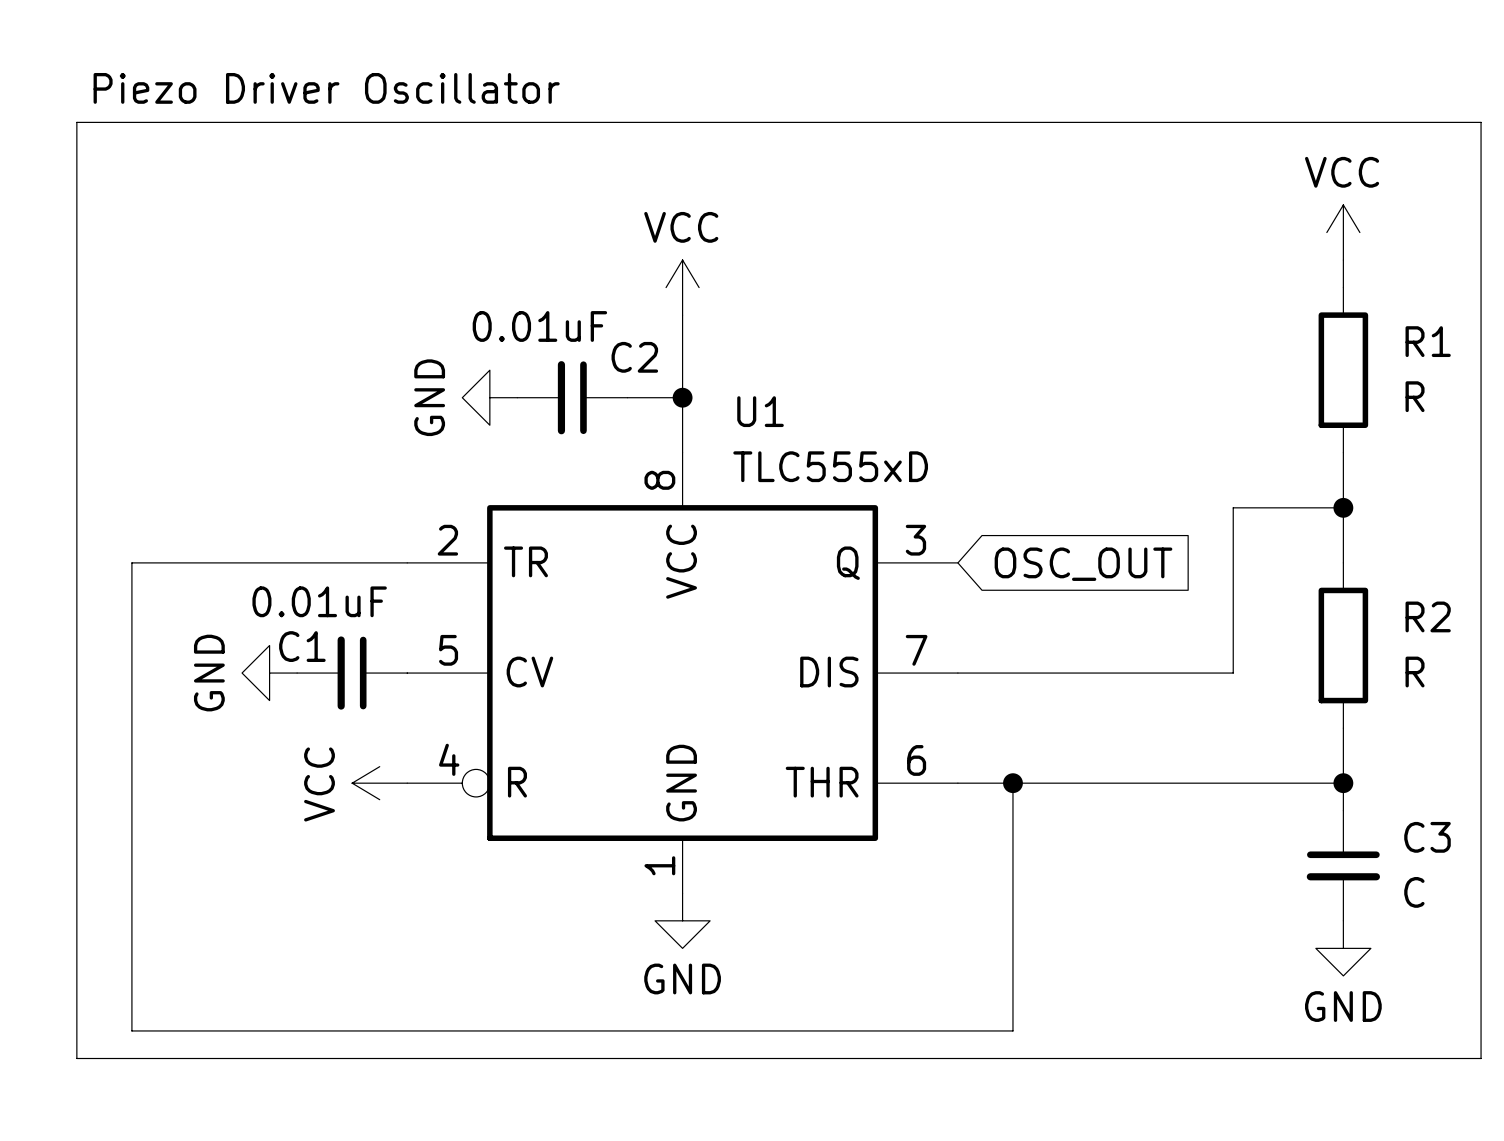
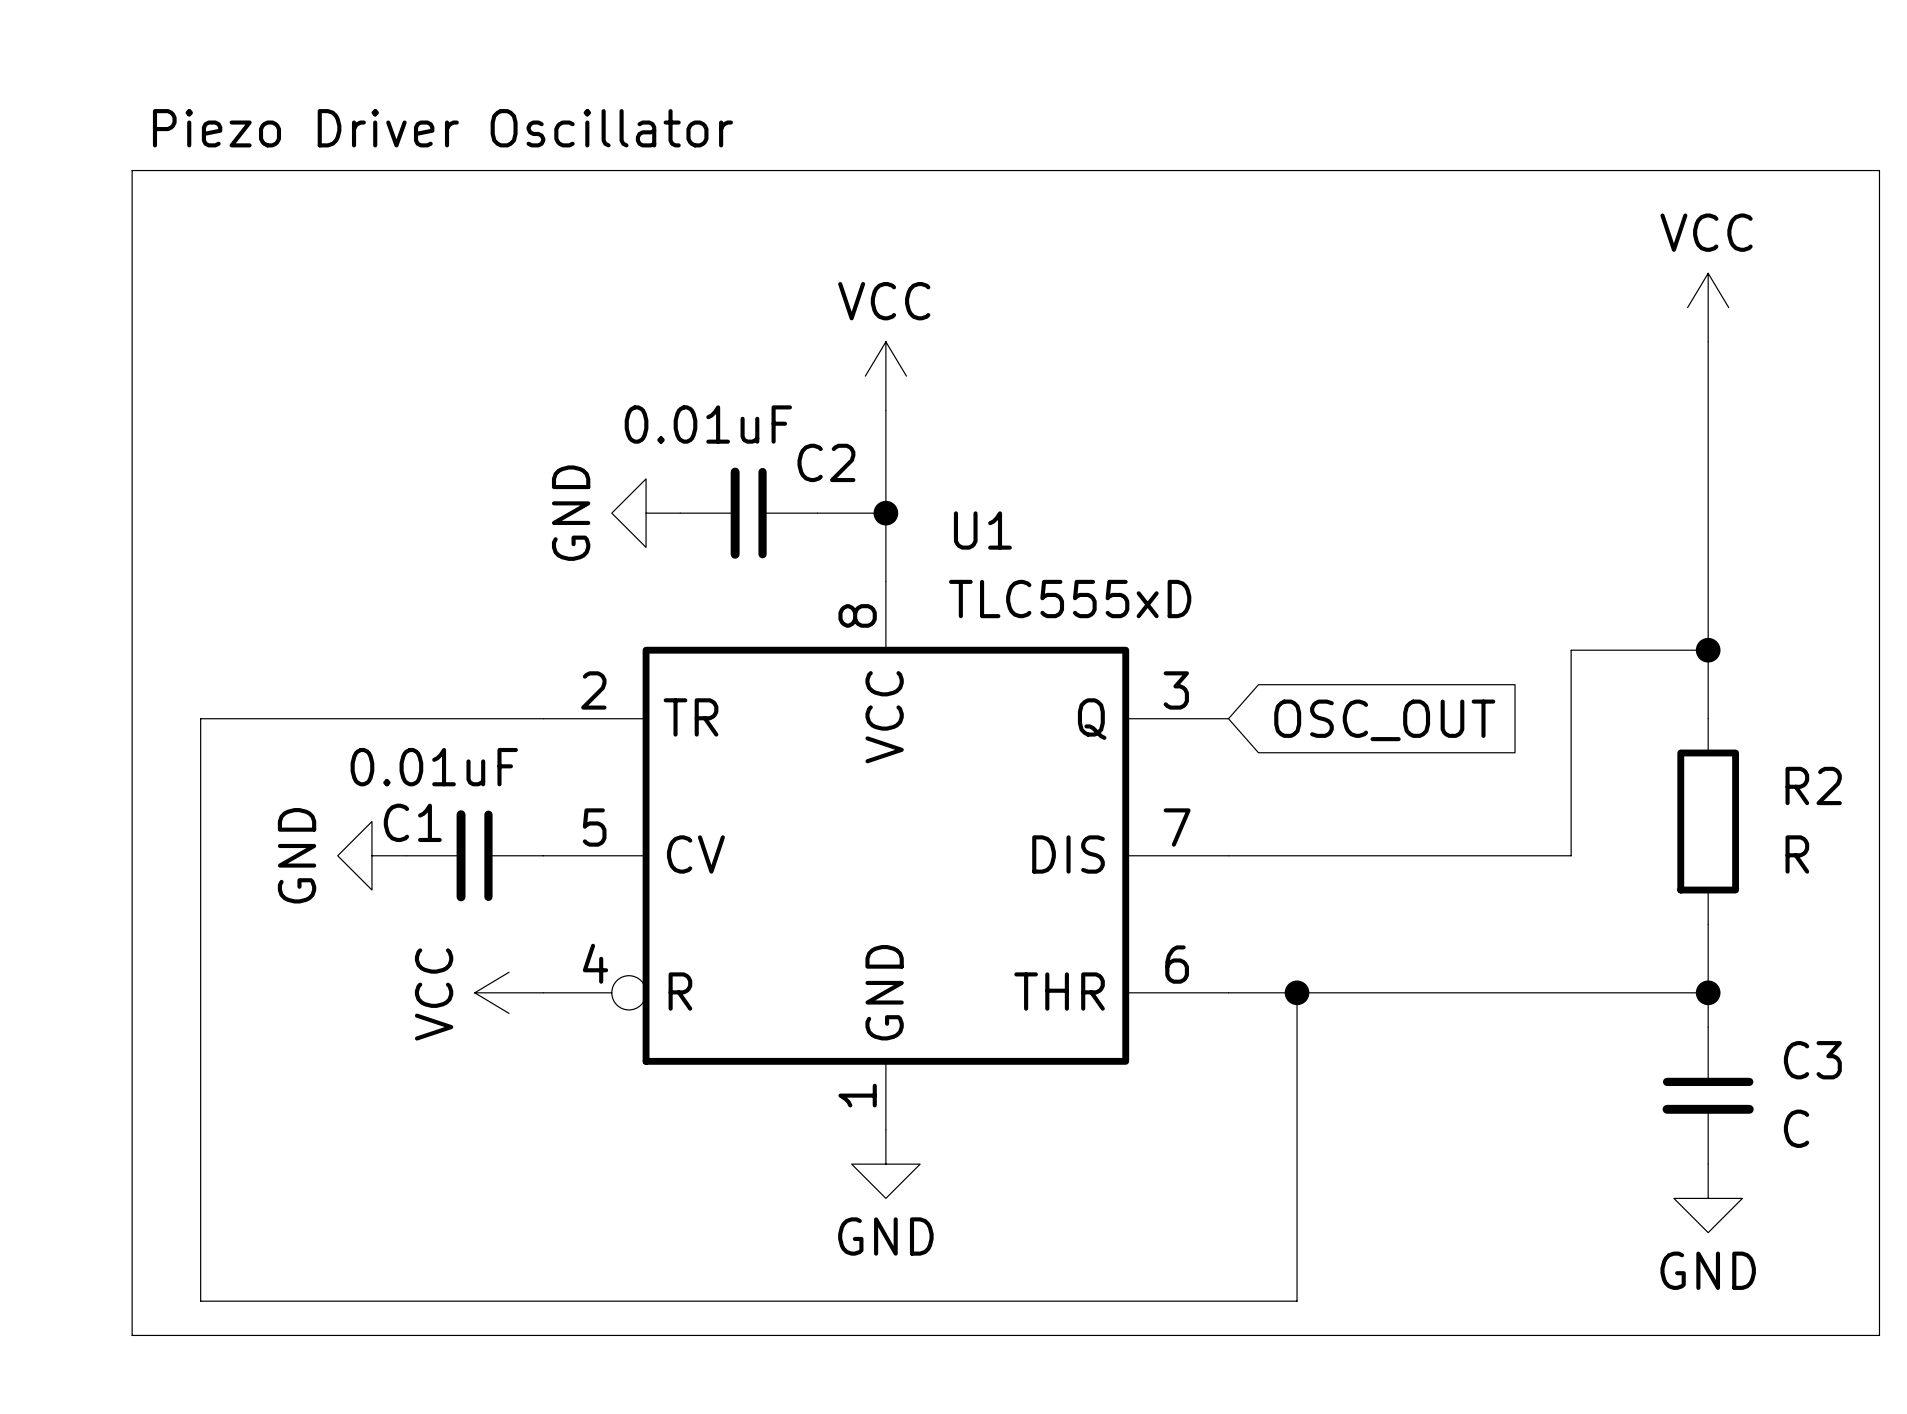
wire: none -> (1708, 376) (1708, 581)
R1: R (1343, 370) -> none

